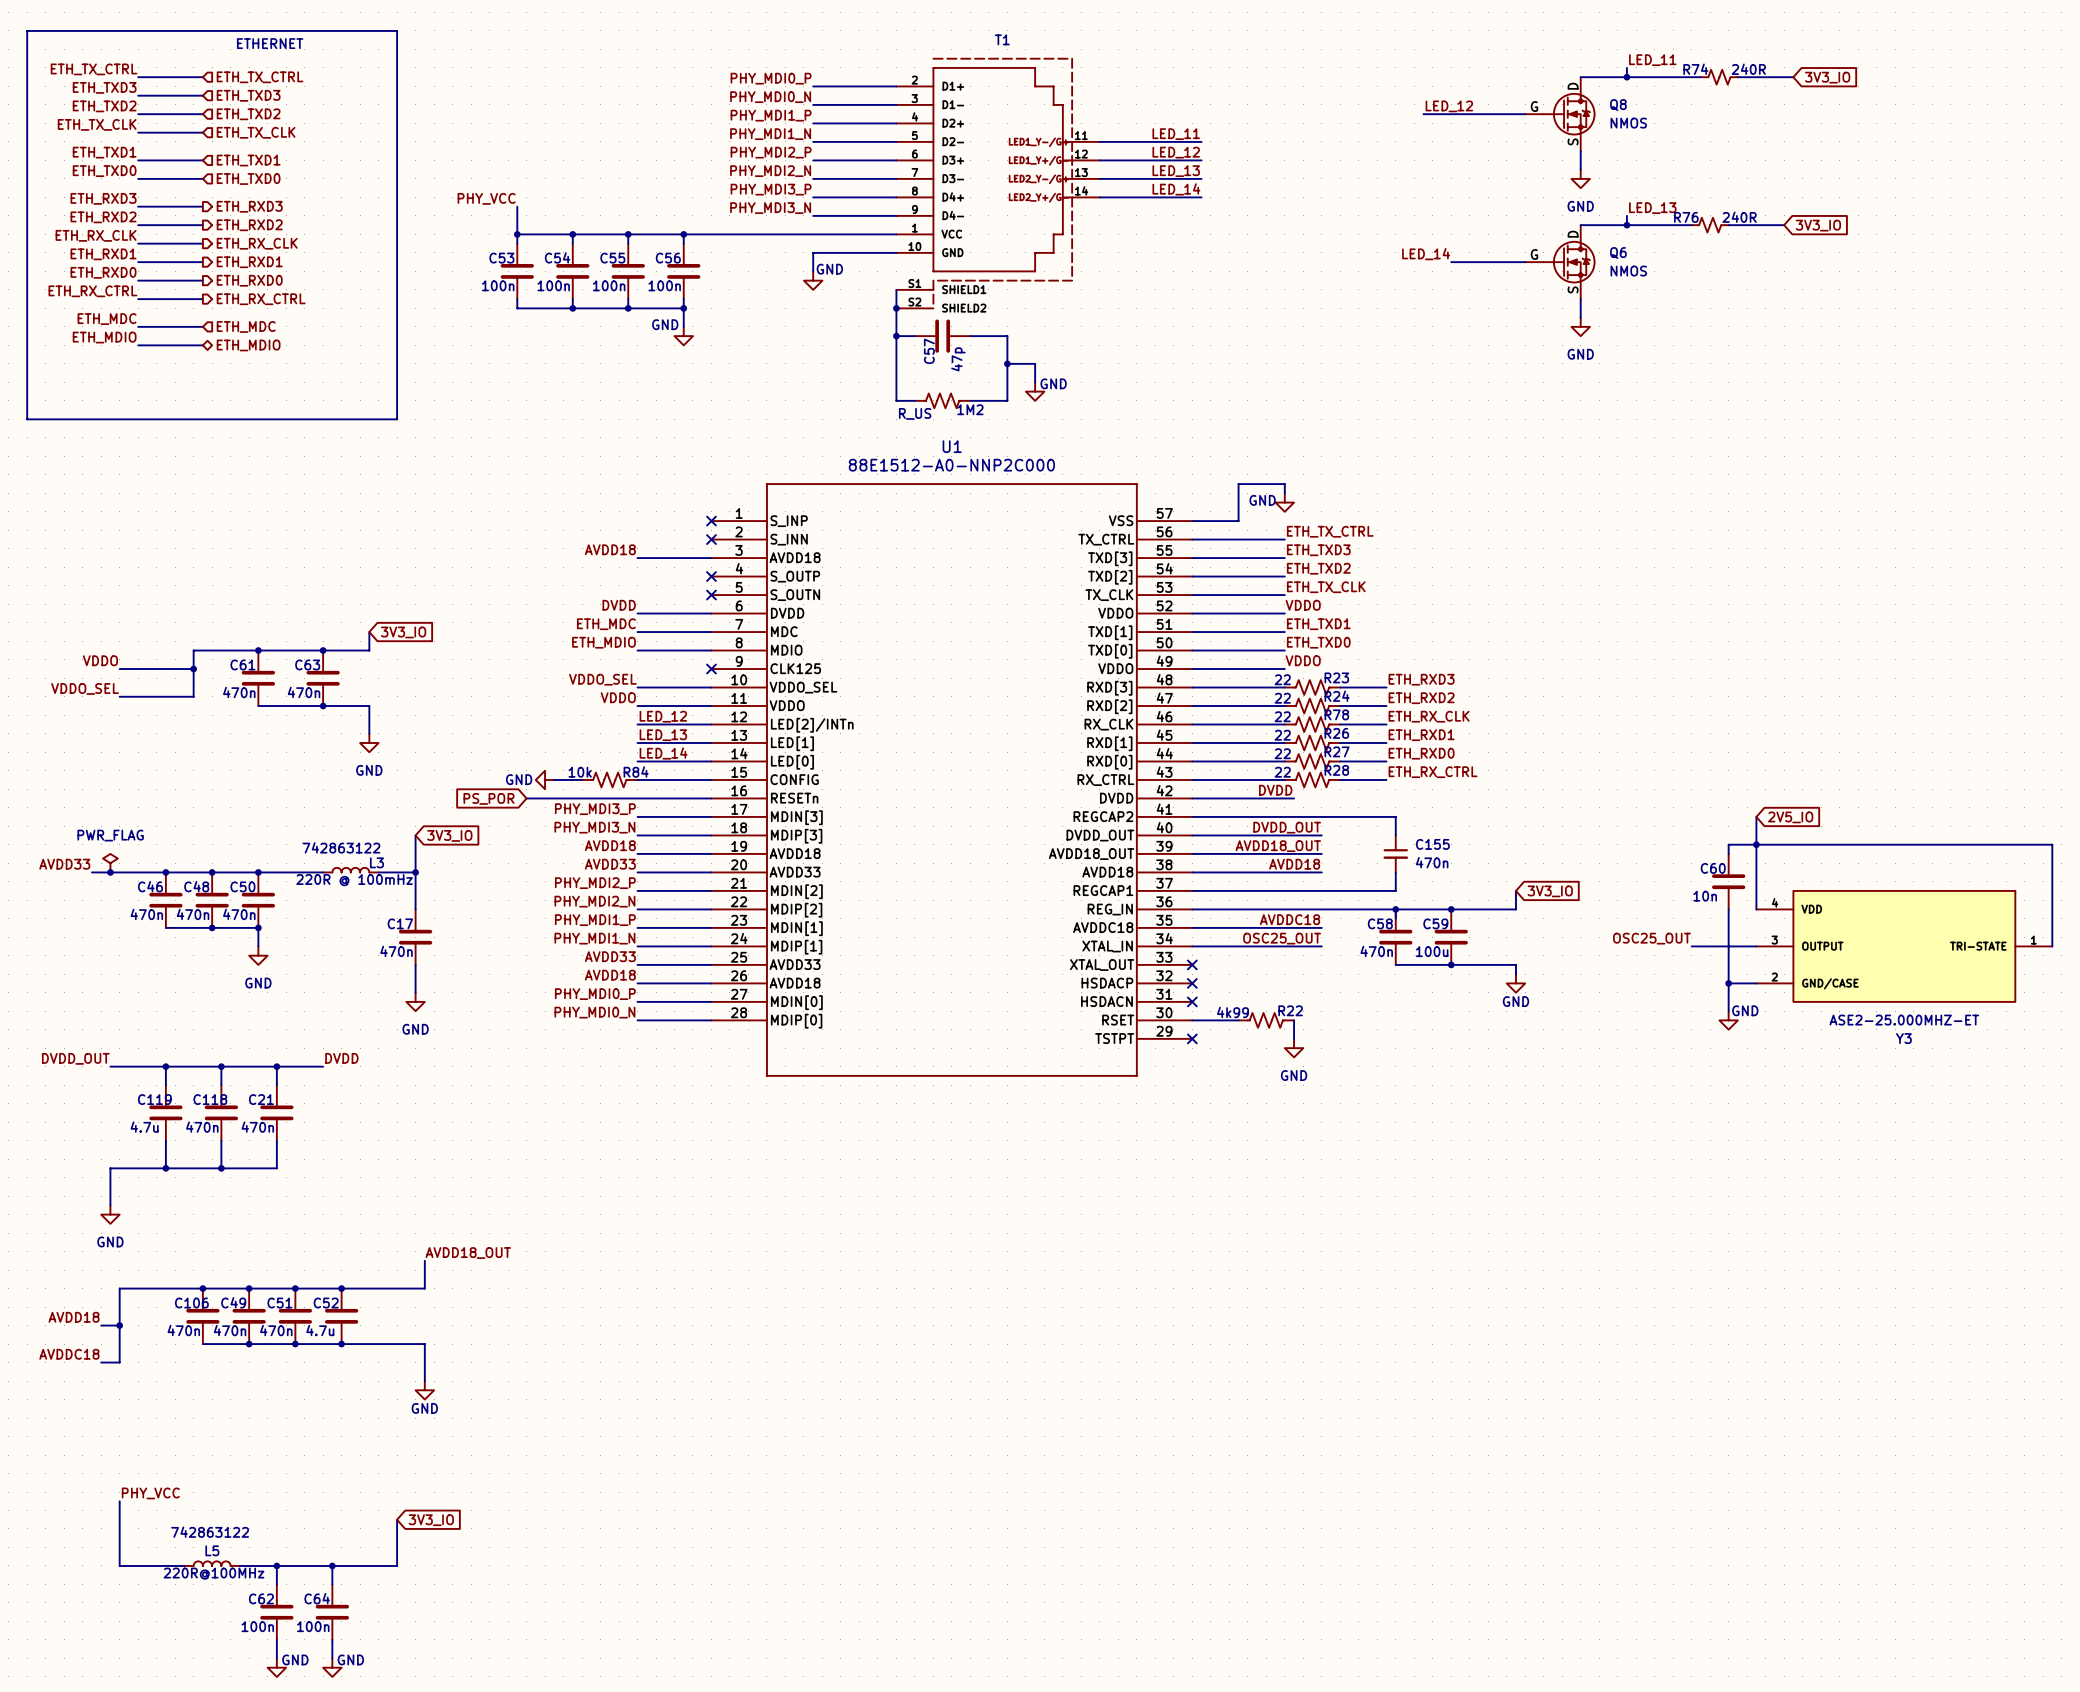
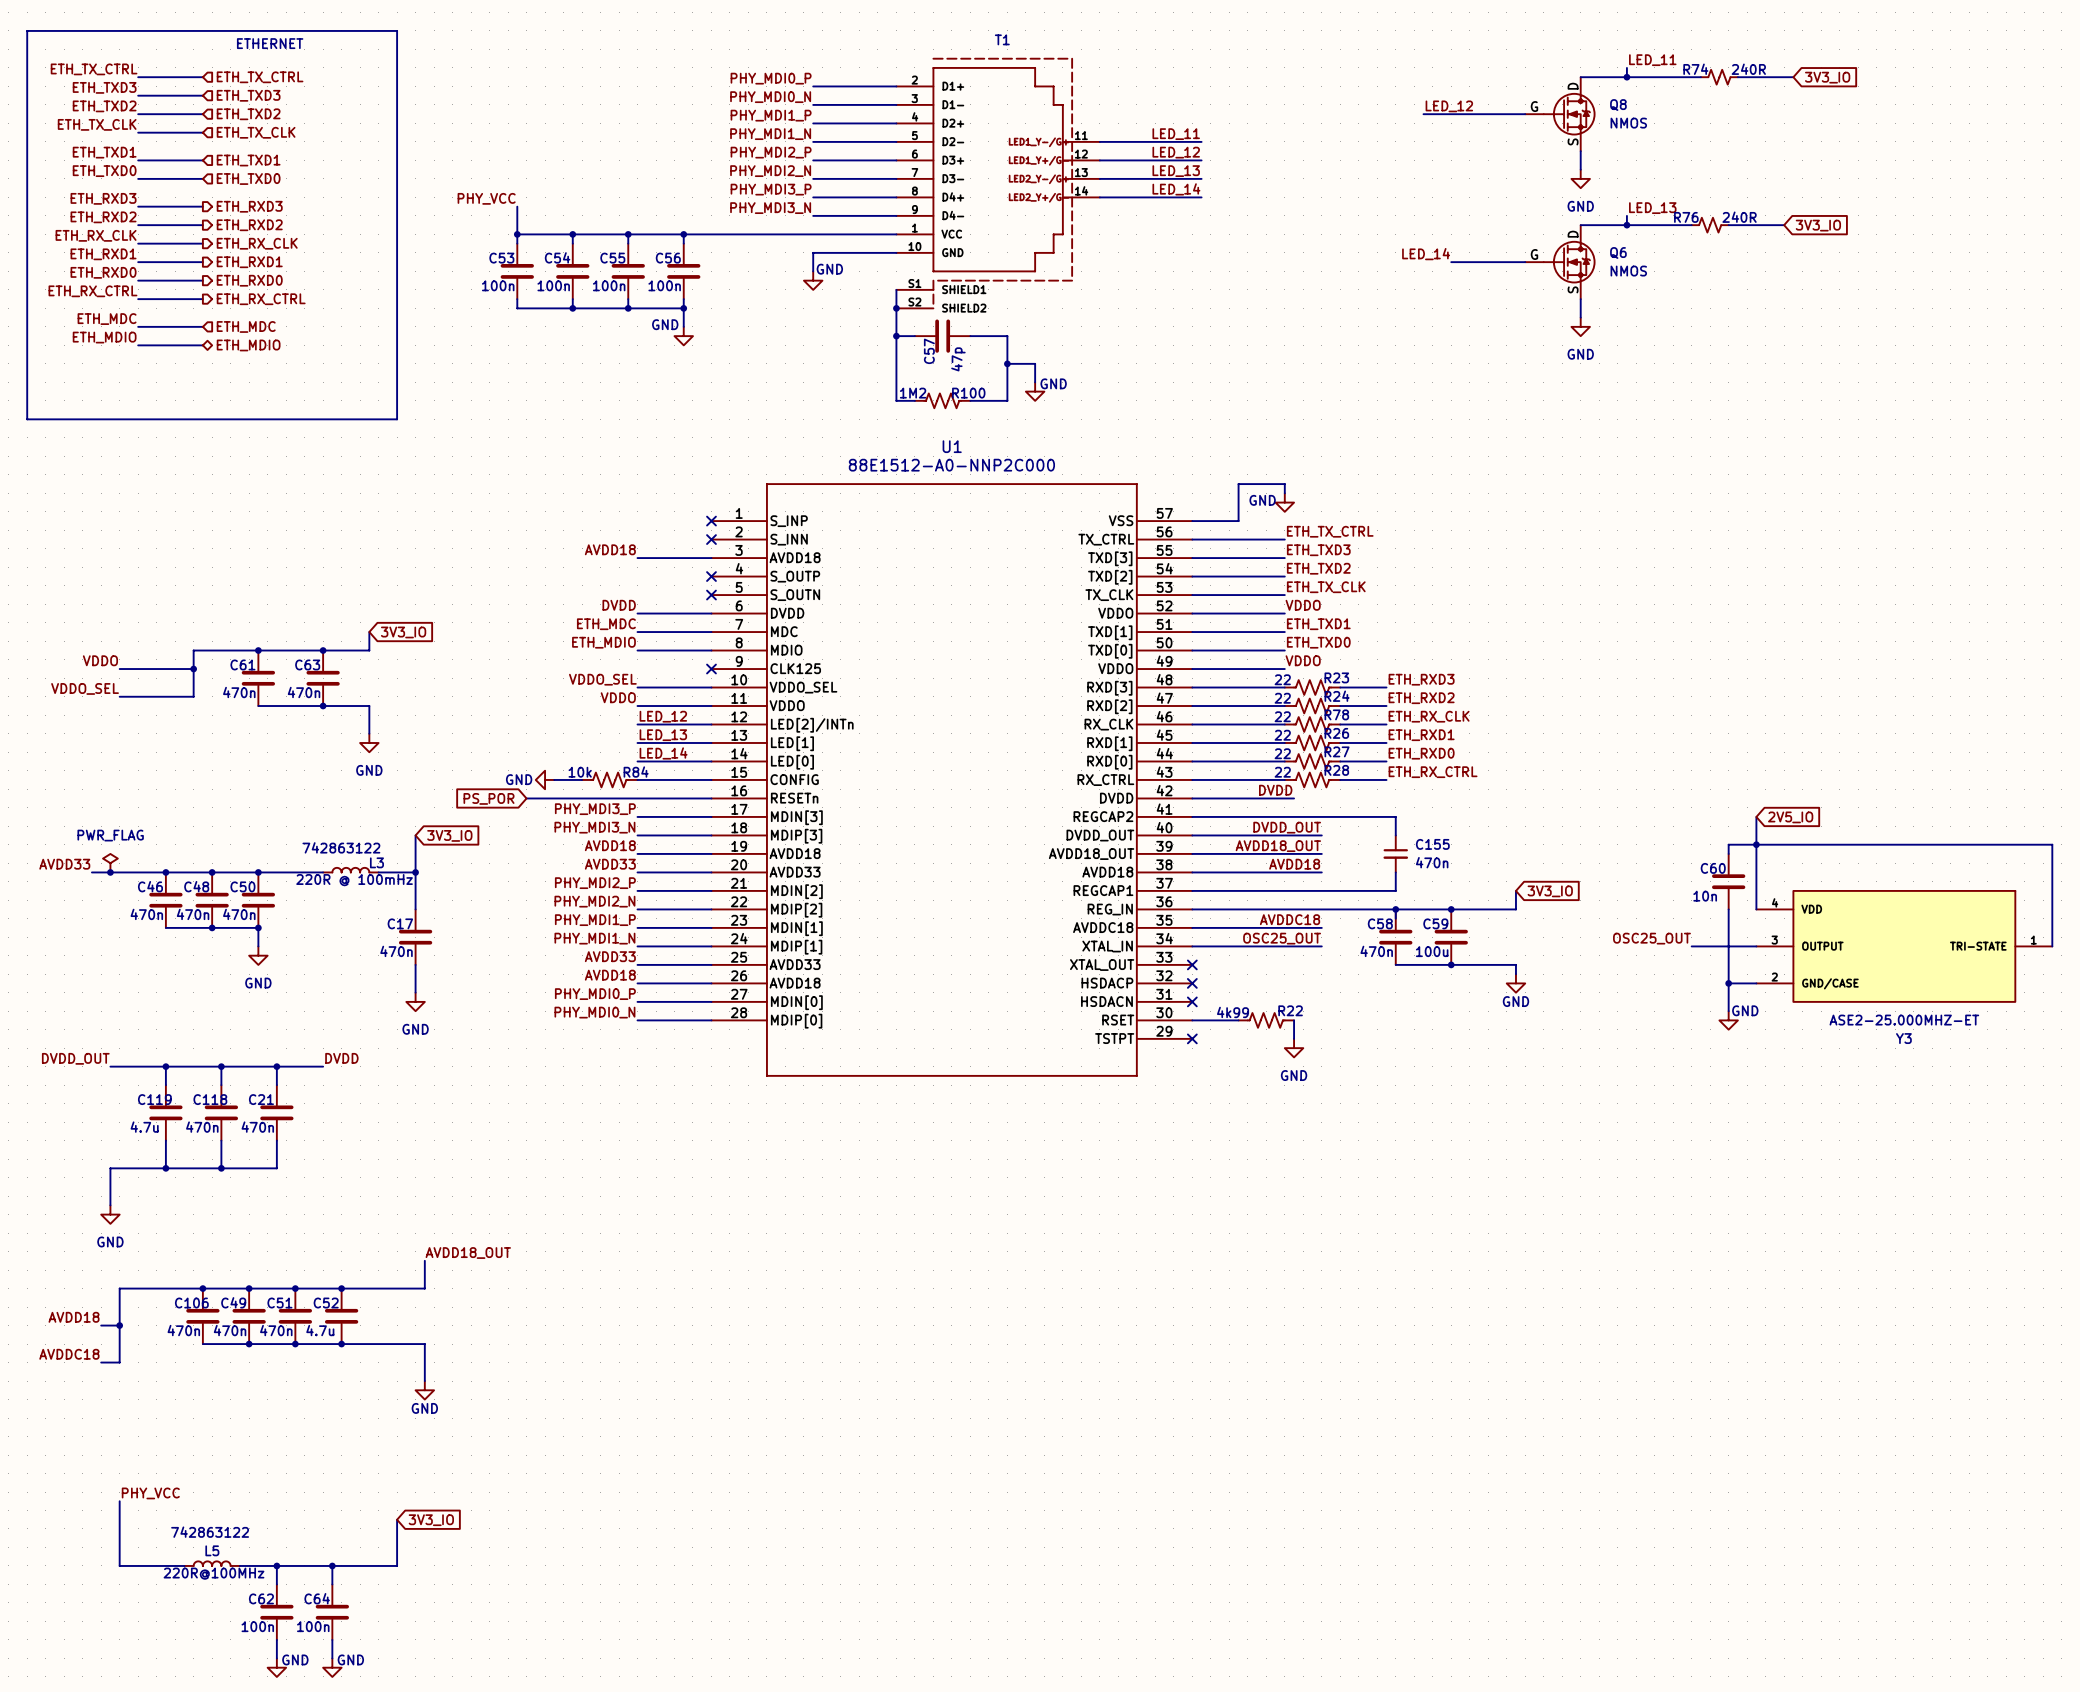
1M2 name: 1M2 (970, 409) -> R100 (968, 393)
1M2 value: R_US (915, 413) -> 1M2 (913, 393)

